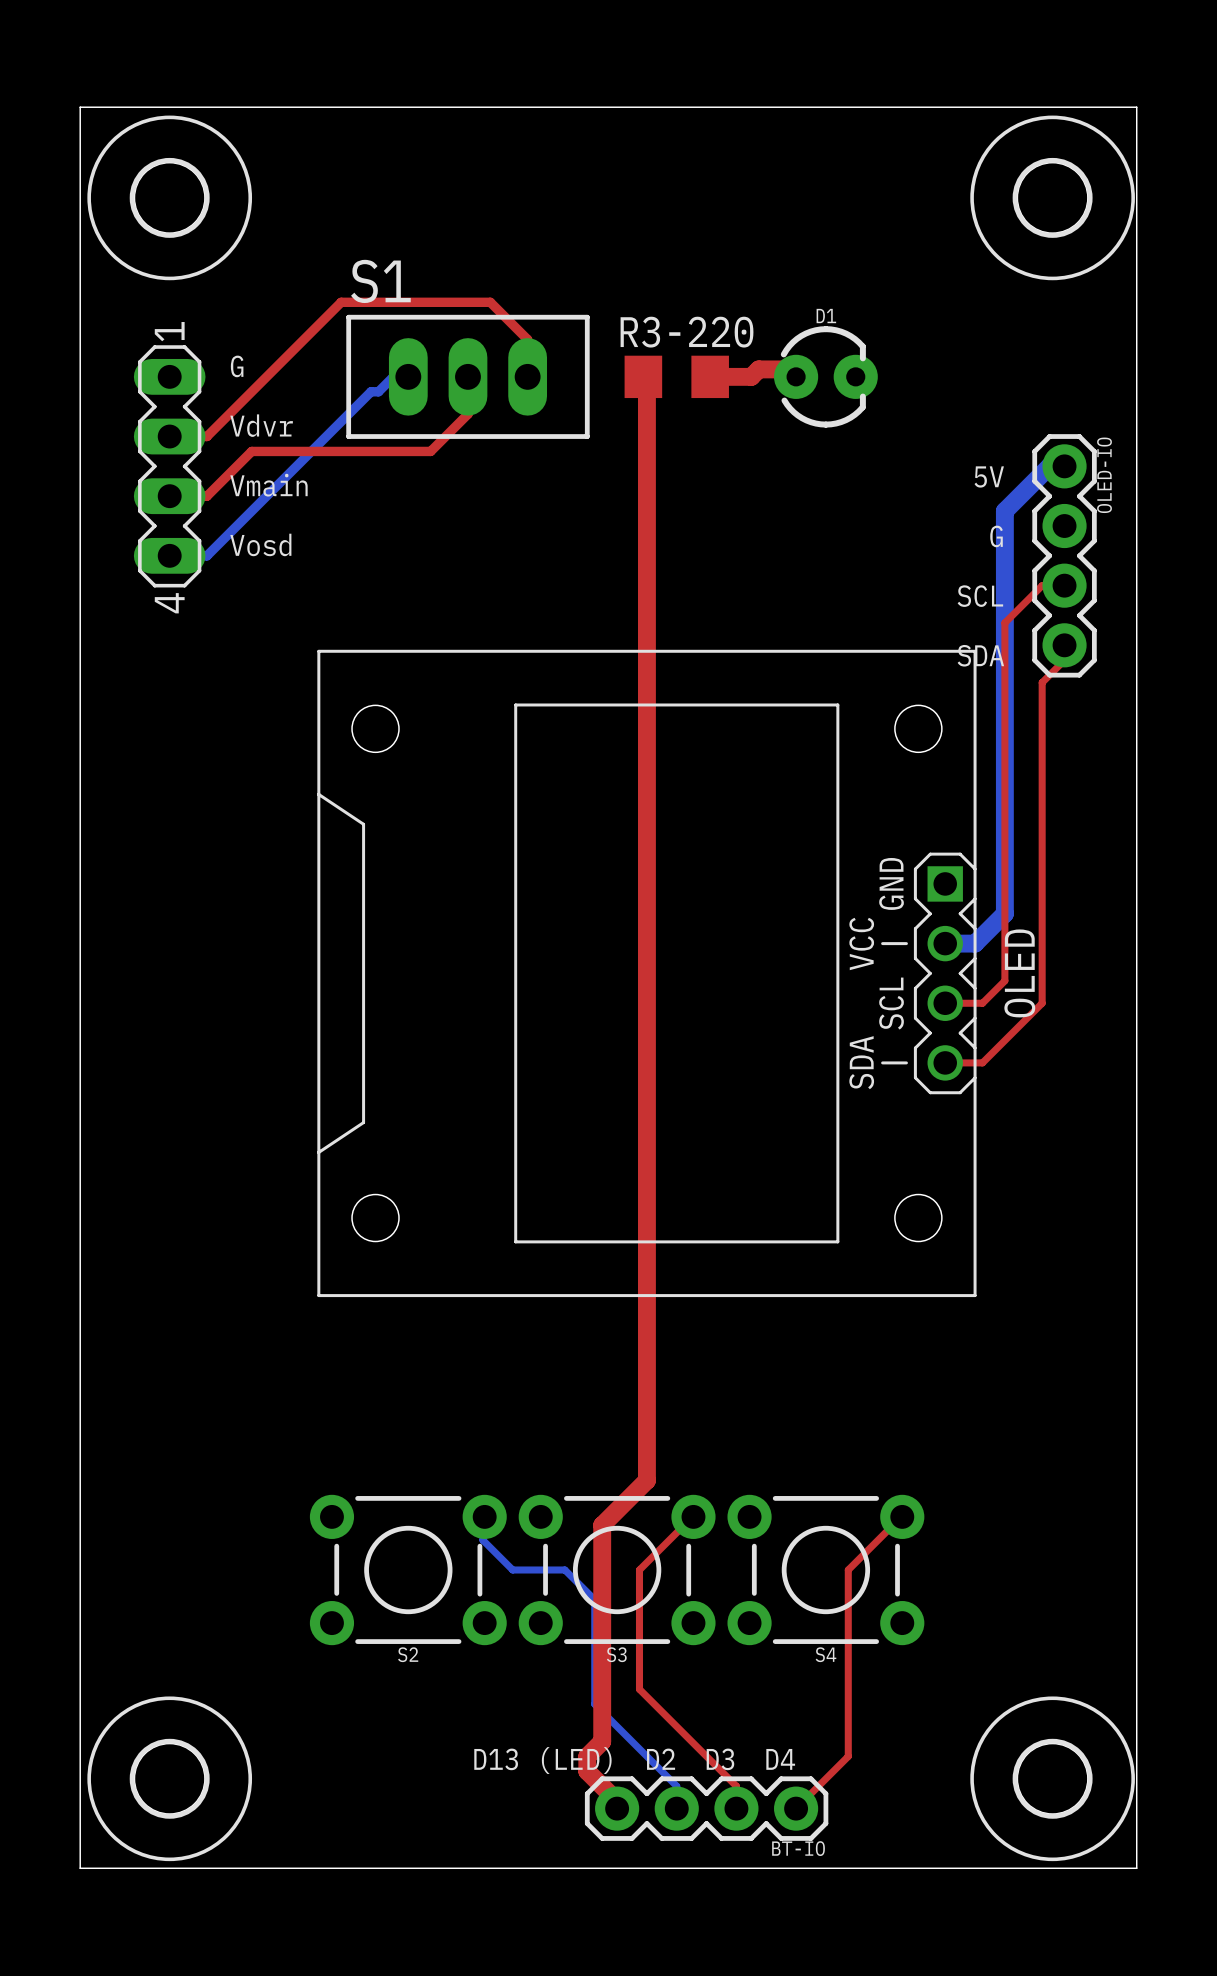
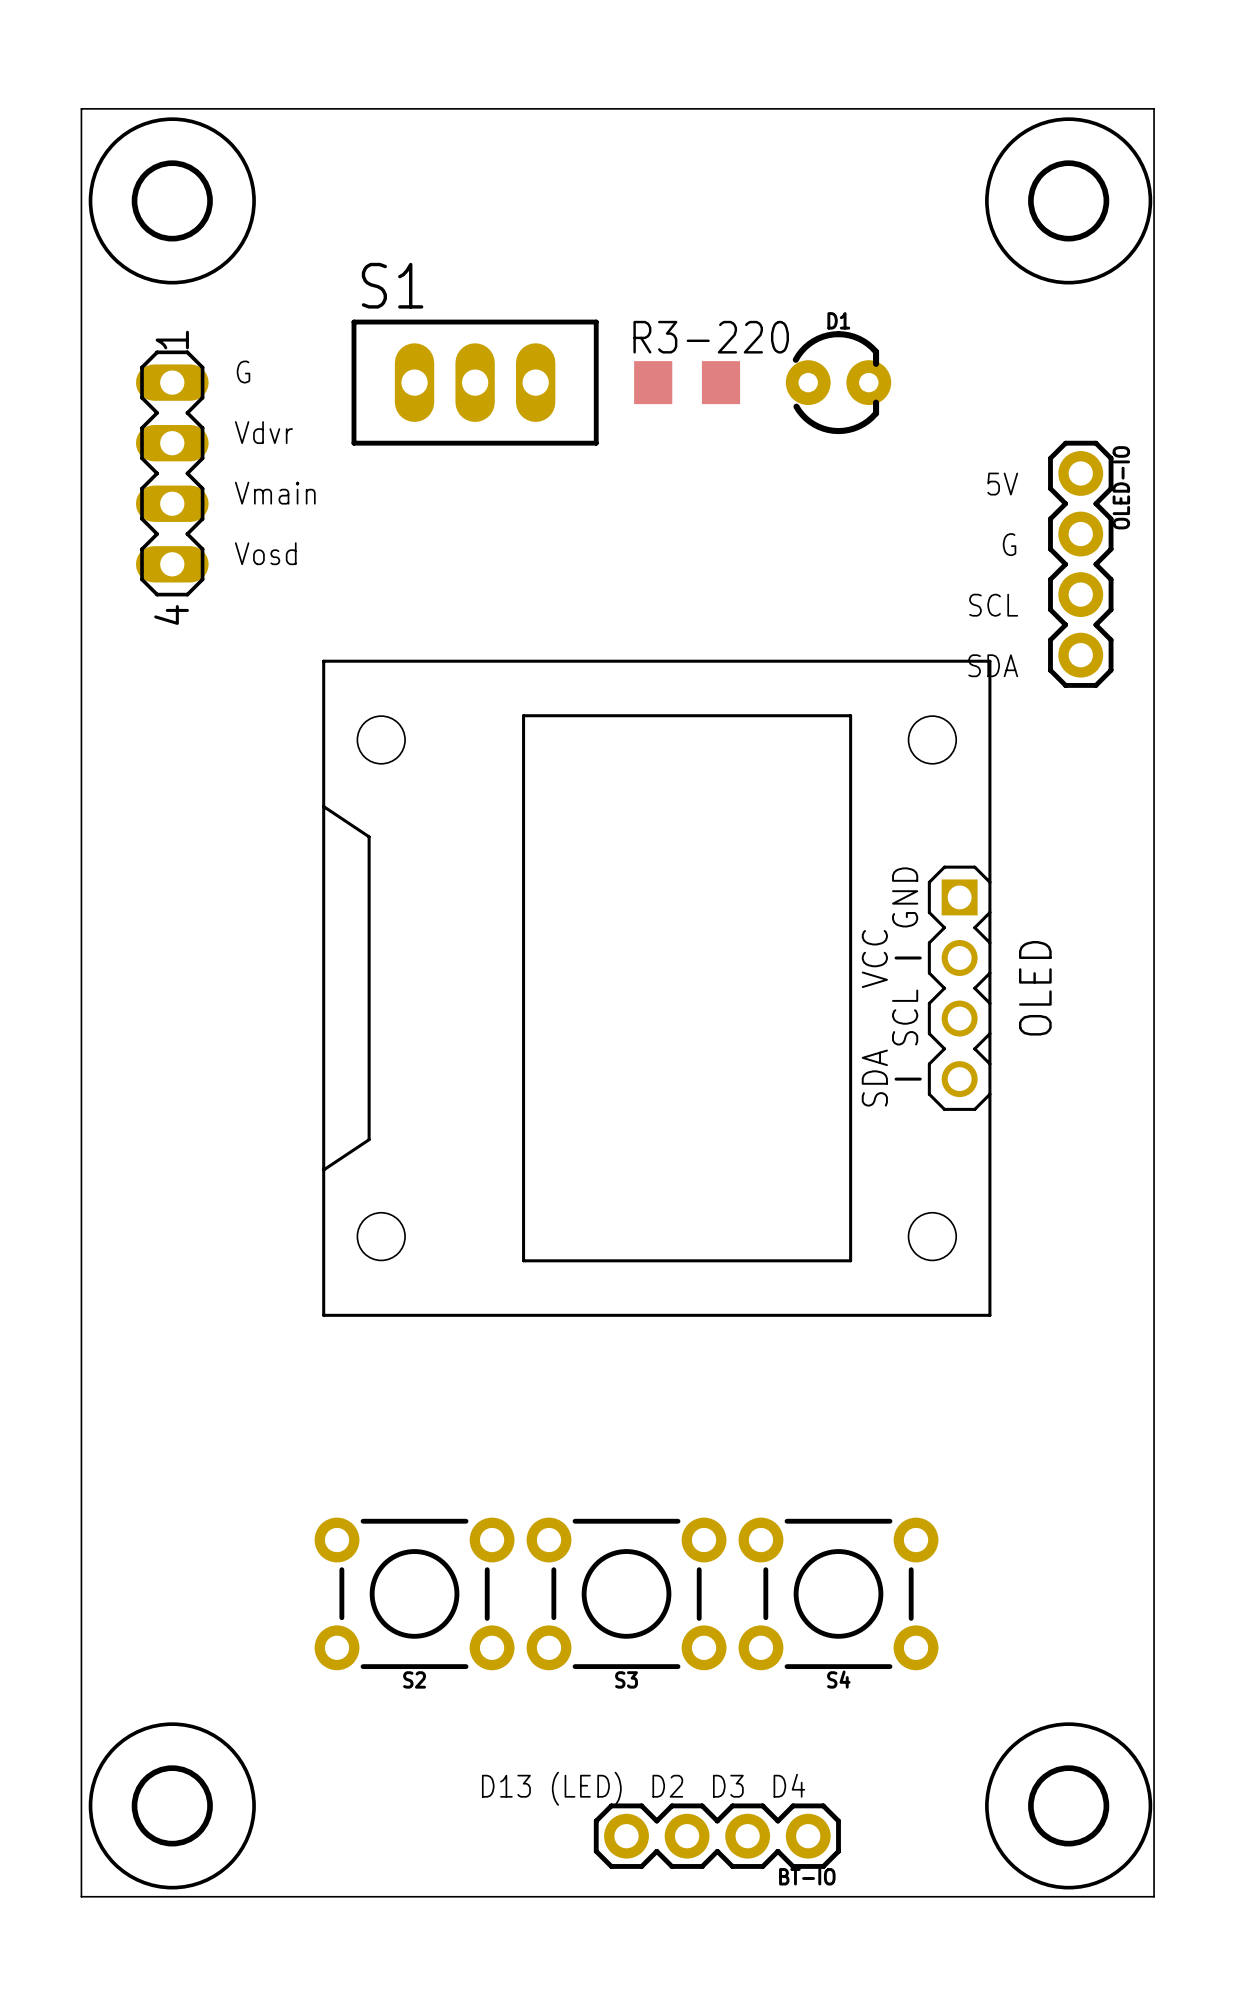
bottom track: (408, 376) (393, 376) (378, 391) (371, 391) (206, 555) (169, 555) -> none
top track: (467, 376) (467, 414) (430, 451) (251, 451) (206, 496) (169, 496) -> none
top track: (527, 376) (527, 339) (490, 302) (341, 302) (206, 436) (169, 436) -> none
top track: (643, 376) (646, 376) (646, 1480) (602, 1525) (602, 1741) (587, 1756) (587, 1771) (617, 1801) (617, 1808) -> none
top track: (710, 376) (751, 376) (758, 369) (788, 369) (796, 376) -> none
bottom track: (1064, 466) (1049, 466) (1004, 511) (1004, 913) (975, 943) (945, 943) -> none
top track: (1064, 585) (1042, 585) (1004, 622) (1004, 980) (982, 1003) (945, 1003) -> none
top track: (1064, 645) (1064, 660) (1042, 682) (1042, 1003) (982, 1062) (945, 1062) -> none
bottom track: (484, 1516) (482, 1517) (482, 1540) (512, 1569) (564, 1569) (594, 1599) (594, 1704) (676, 1786) (676, 1808) -> none
top track: (693, 1516) (639, 1569) (639, 1689) (736, 1786) (736, 1808) -> none
top track: (902, 1516) (848, 1569) (848, 1756) (796, 1808) -> none

